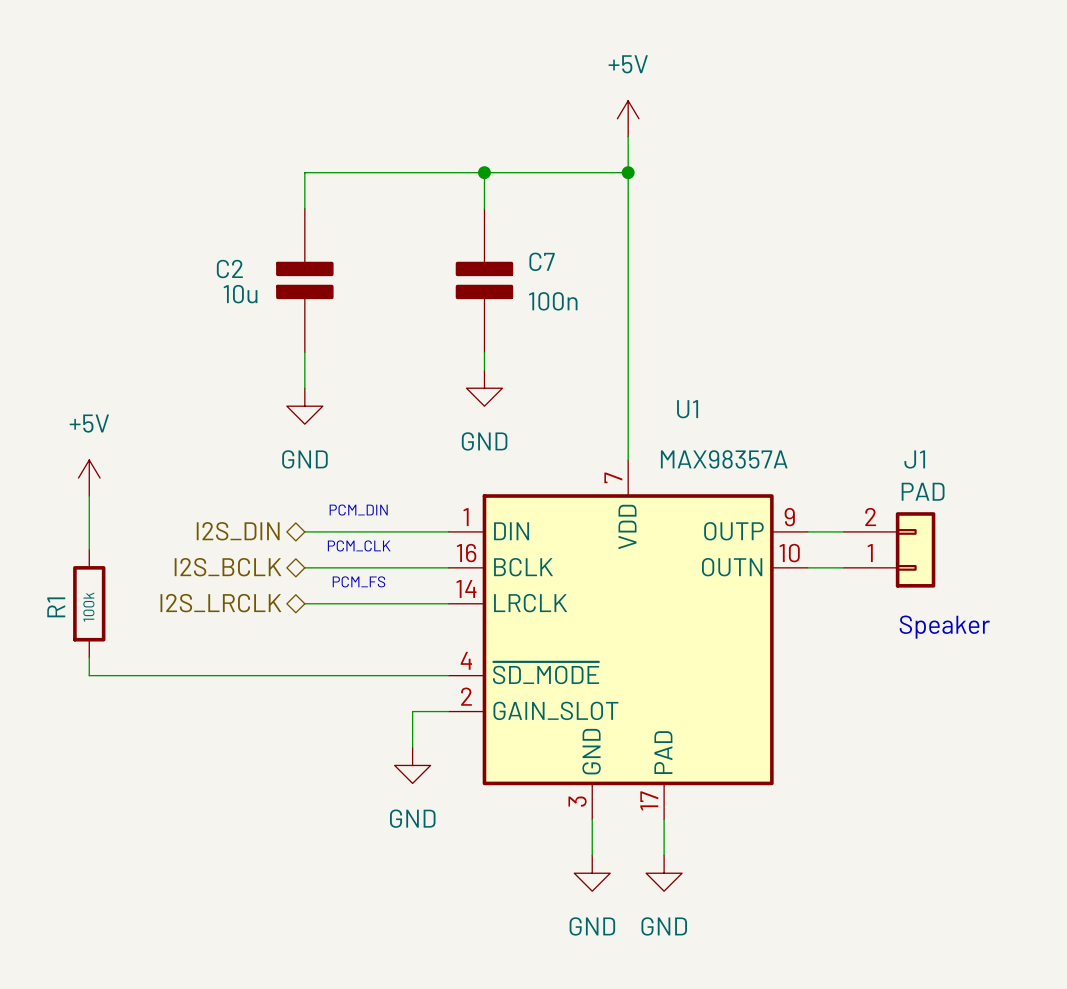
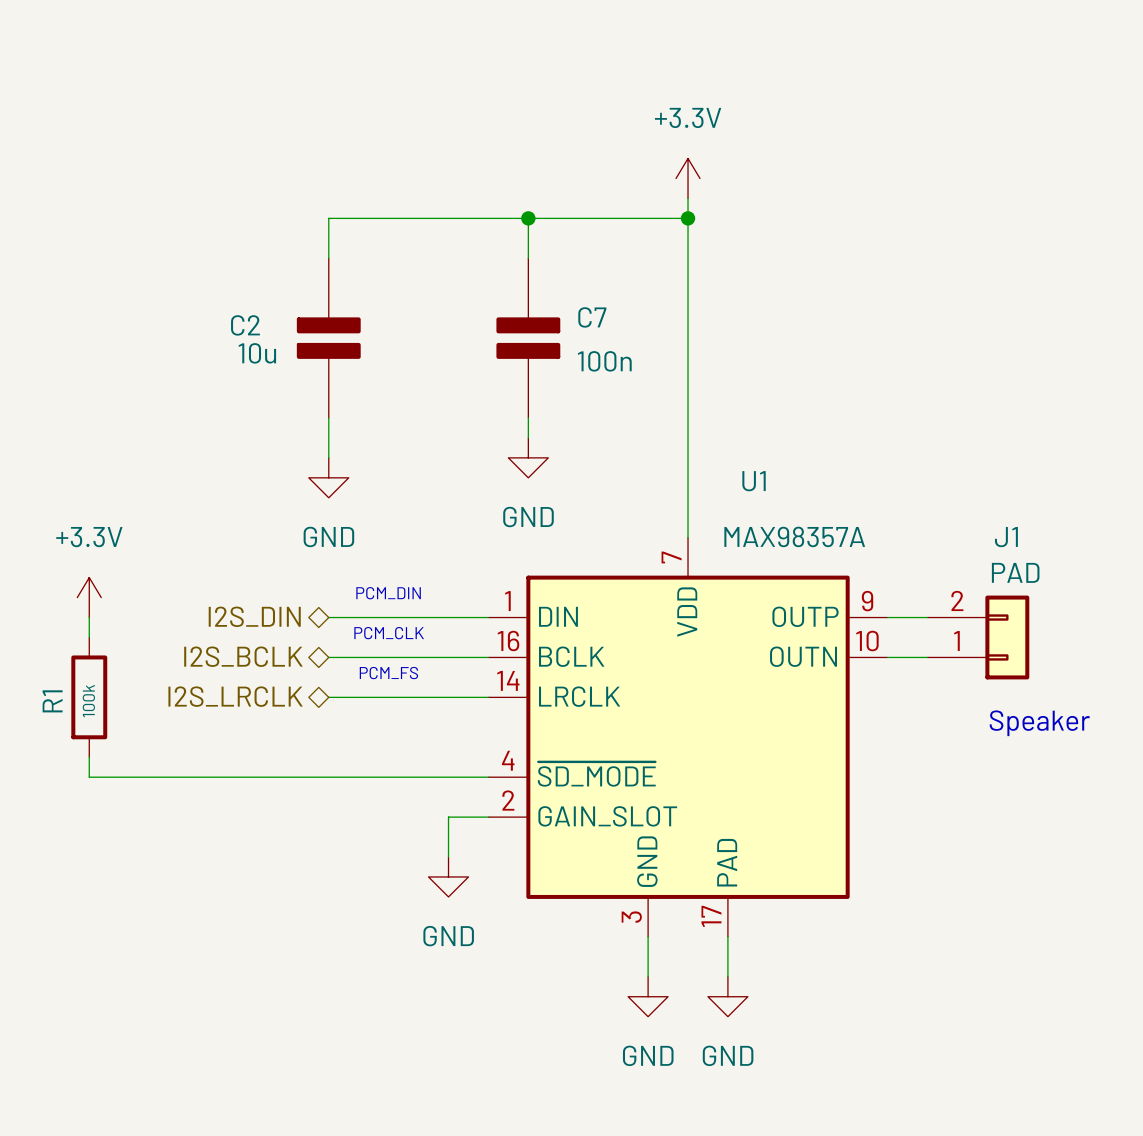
power symbol: +5V (628, 118) -> none
power symbol: none -> +3.3V (688, 178)
power symbol: +5V (89, 478) -> none
power symbol: none -> +3.3V (89, 597)

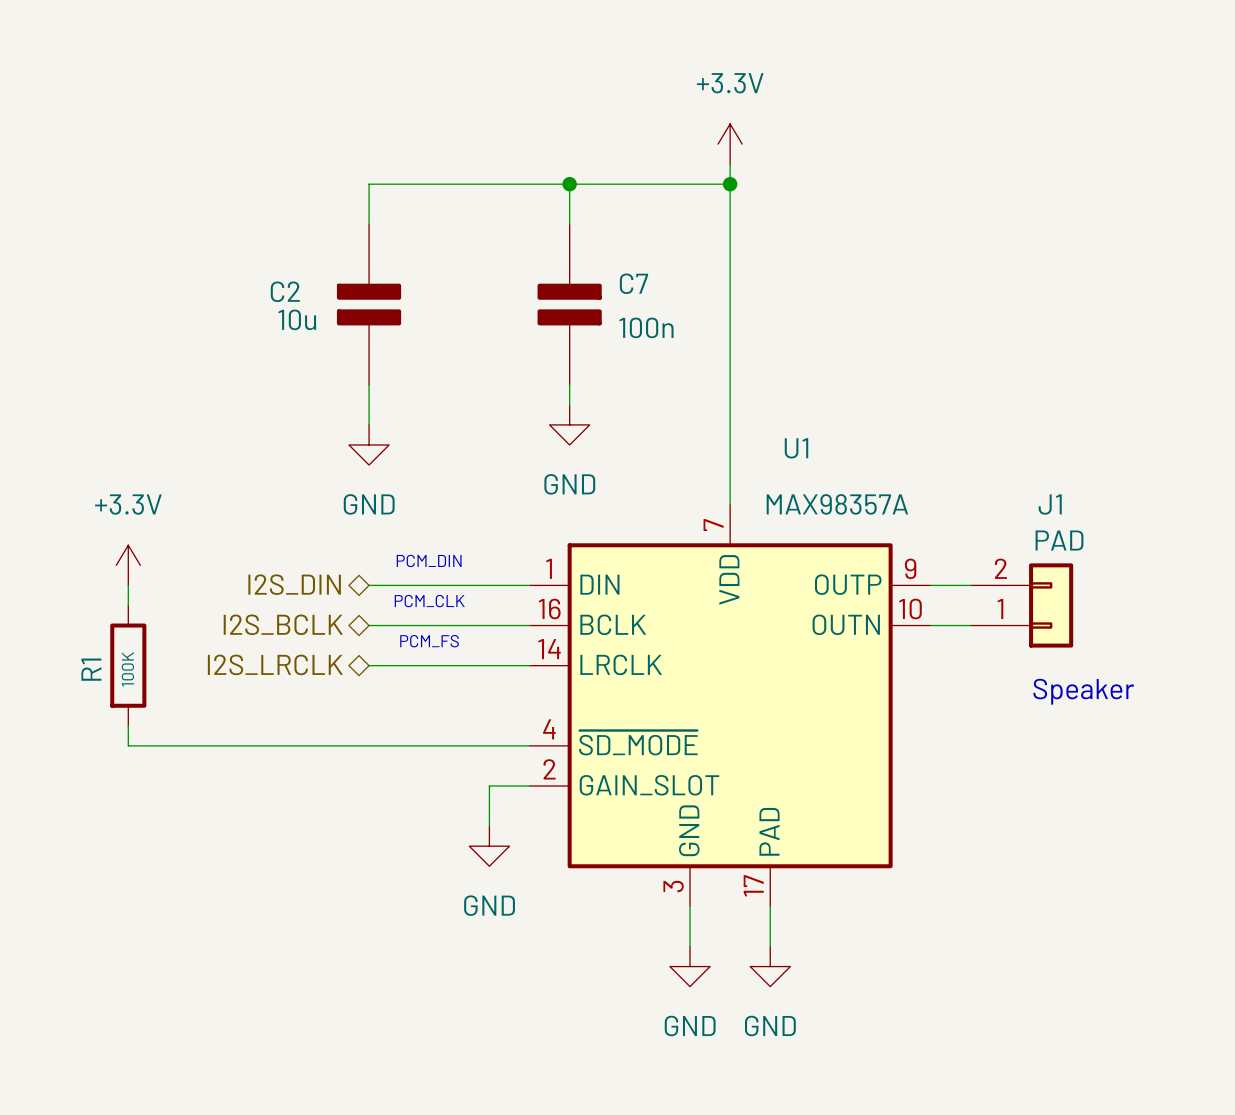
R1 value: 100k (88, 701) -> 100K (127, 669)

